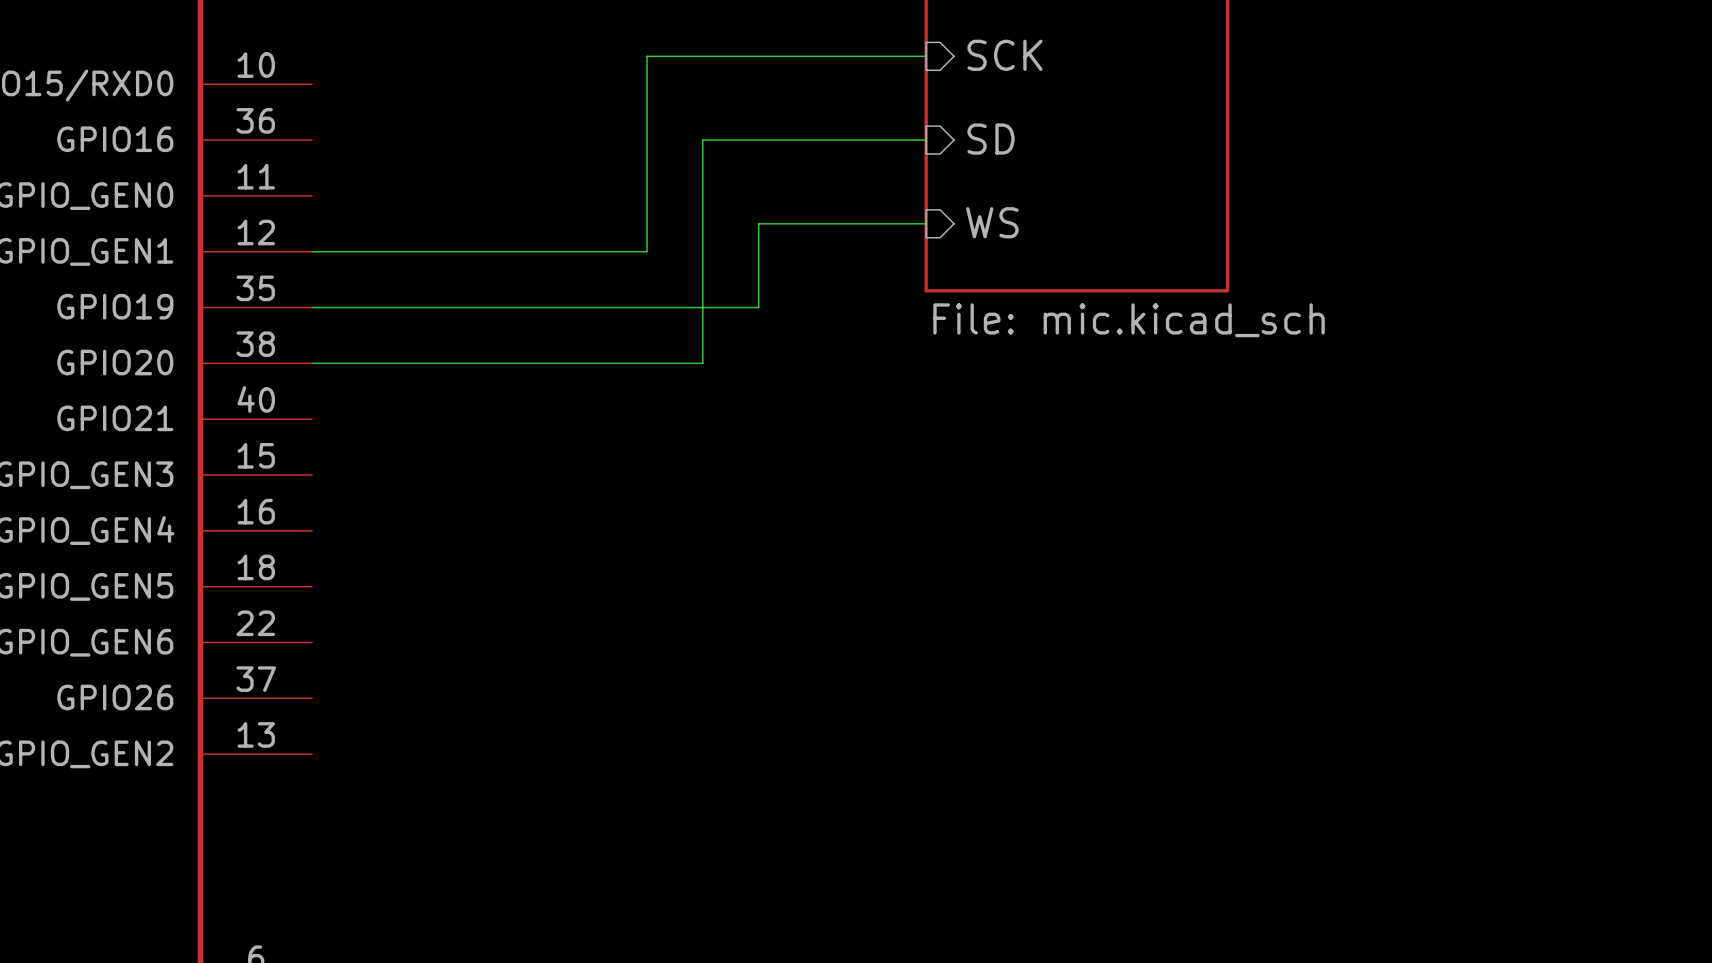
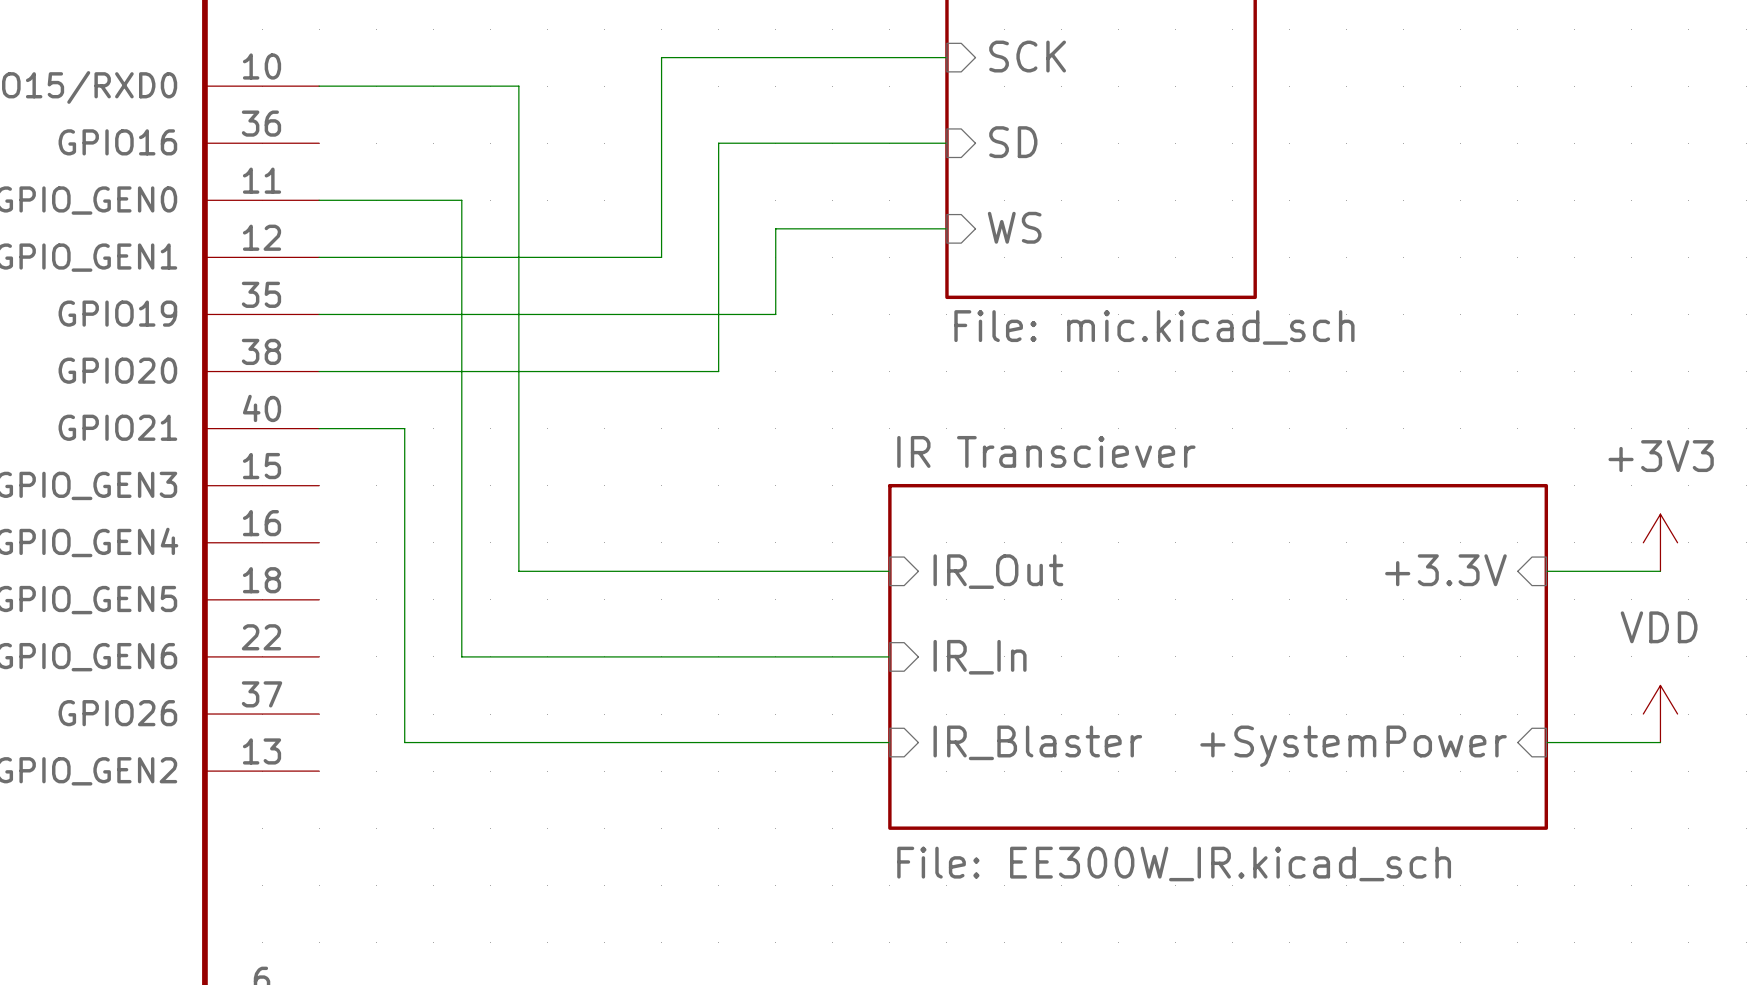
wire: none -> (319, 86) (518, 86) (518, 571) (889, 571)
wire: none -> (319, 200) (461, 200) (461, 656) (889, 656)
wire: none -> (319, 428) (404, 428) (404, 742) (889, 742)
power symbol: none -> +3V3 (1660, 542)
sheet pin: none -> +3.3V (1445, 570)
wire: none -> (1546, 571) (1660, 571)
sheet pin: none -> IR_Out (998, 571)
sheet pin: none -> IR_In (980, 657)
sheet IR Transciever: none -> File: EE300W_IR.kicad_sch (1218, 656)
power symbol: none -> VDD (1660, 714)
sheet pin: none -> IR_Blaster (1037, 742)
wire: none -> (1546, 742) (1660, 742)
sheet pin: none -> +SystemPower (1353, 746)

